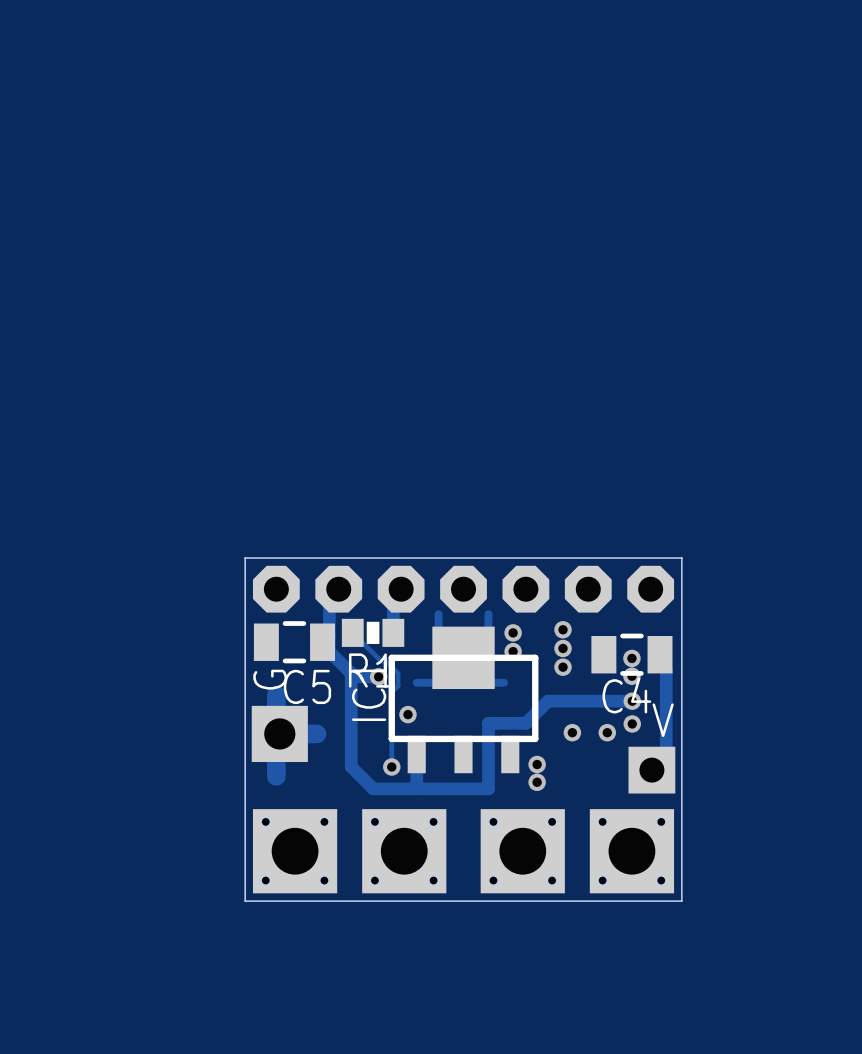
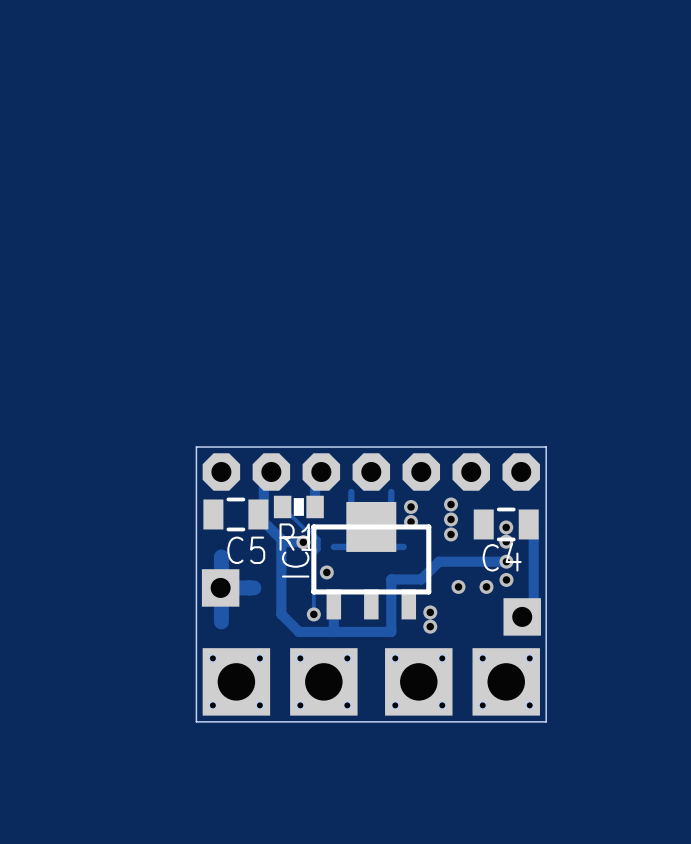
text: G (270, 679) -> none
part footprint: [251, 705, 308, 763] -> [201, 569, 240, 607]
text: V (663, 720) -> none

